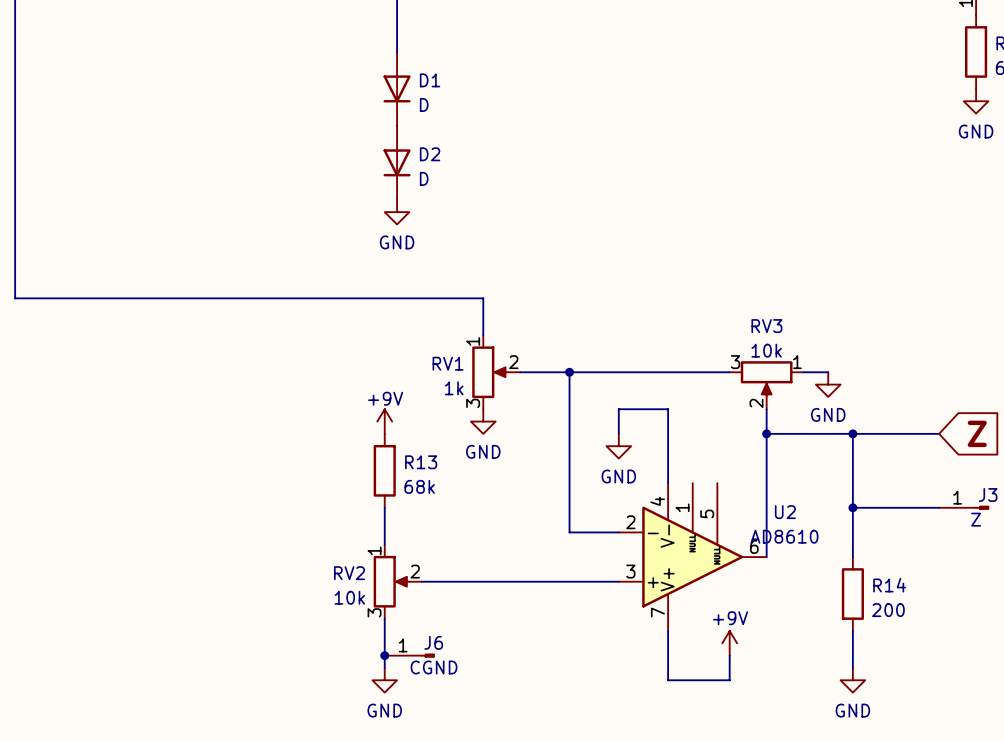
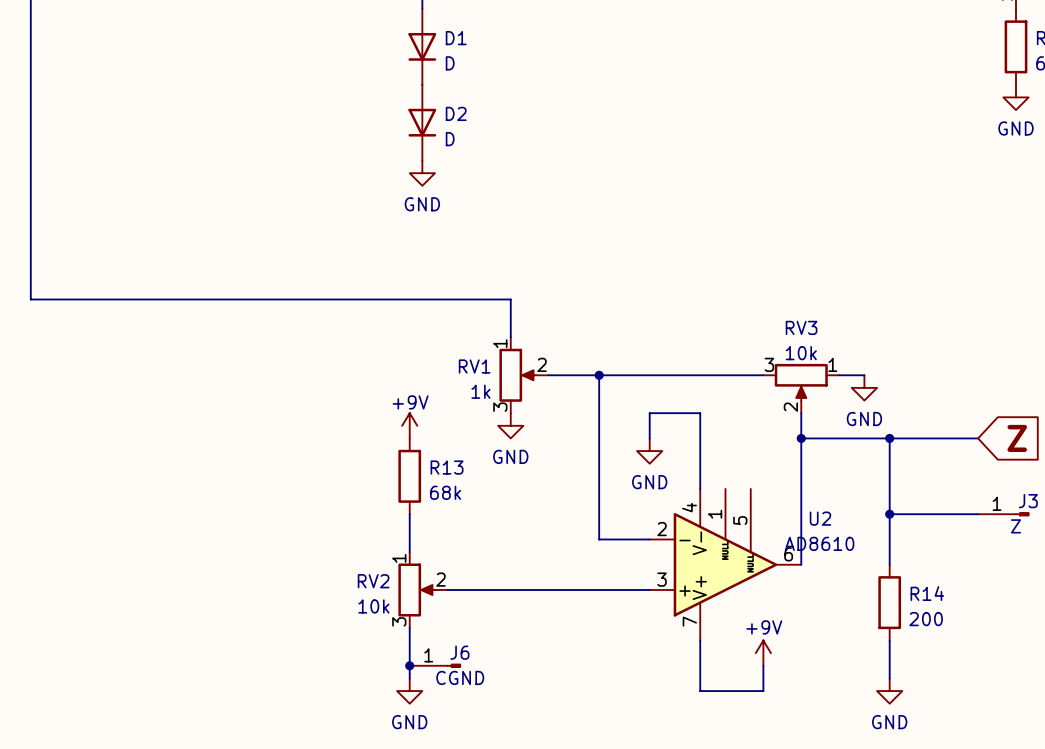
D1 position: (397, 88) -> (422, 46)
D2 position: (397, 162) -> (422, 122)
power symbol position: GND (397, 212) -> GND (422, 173)

